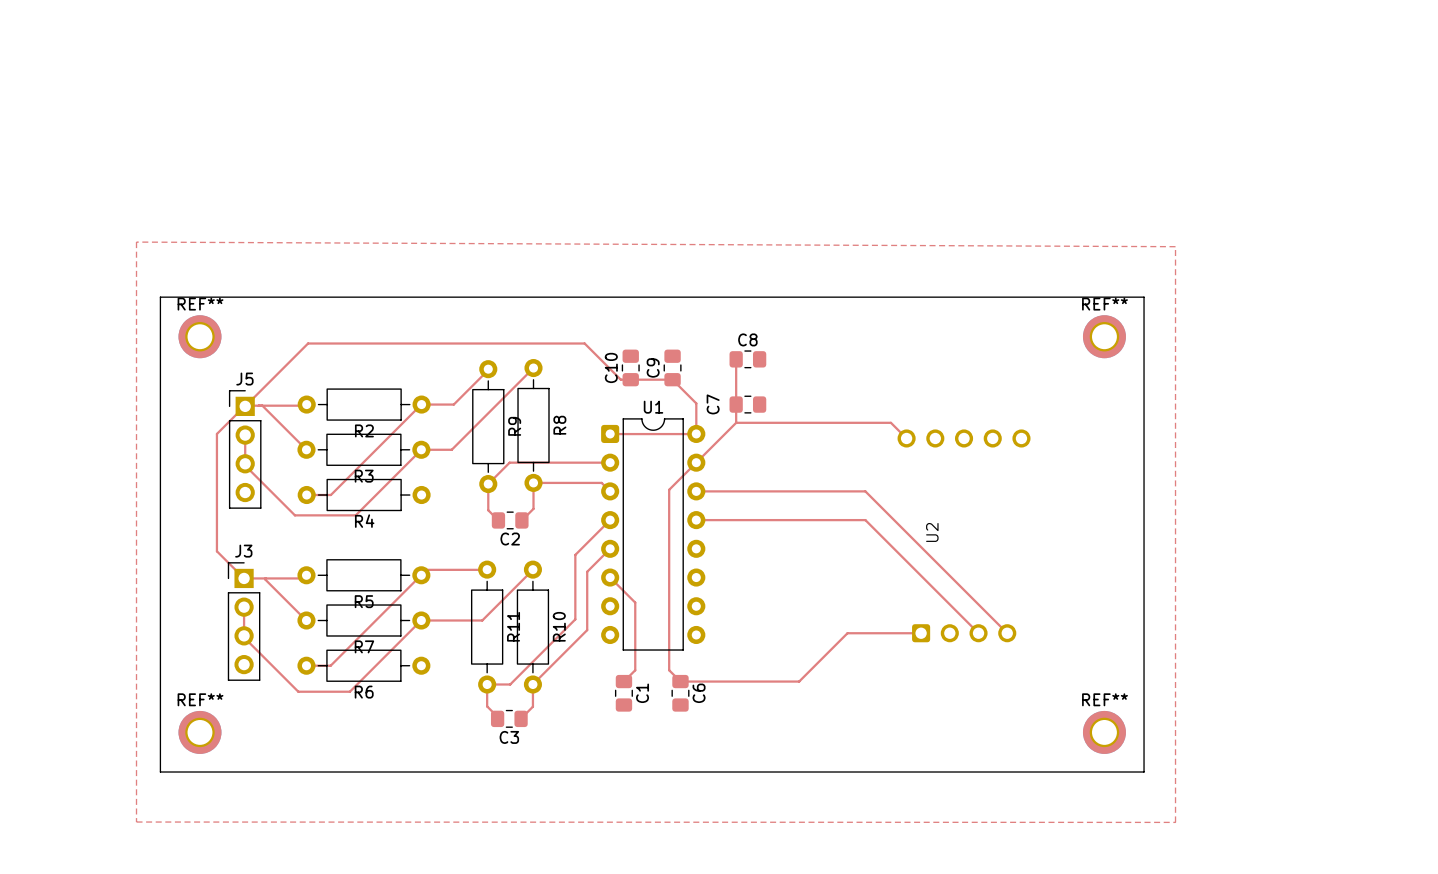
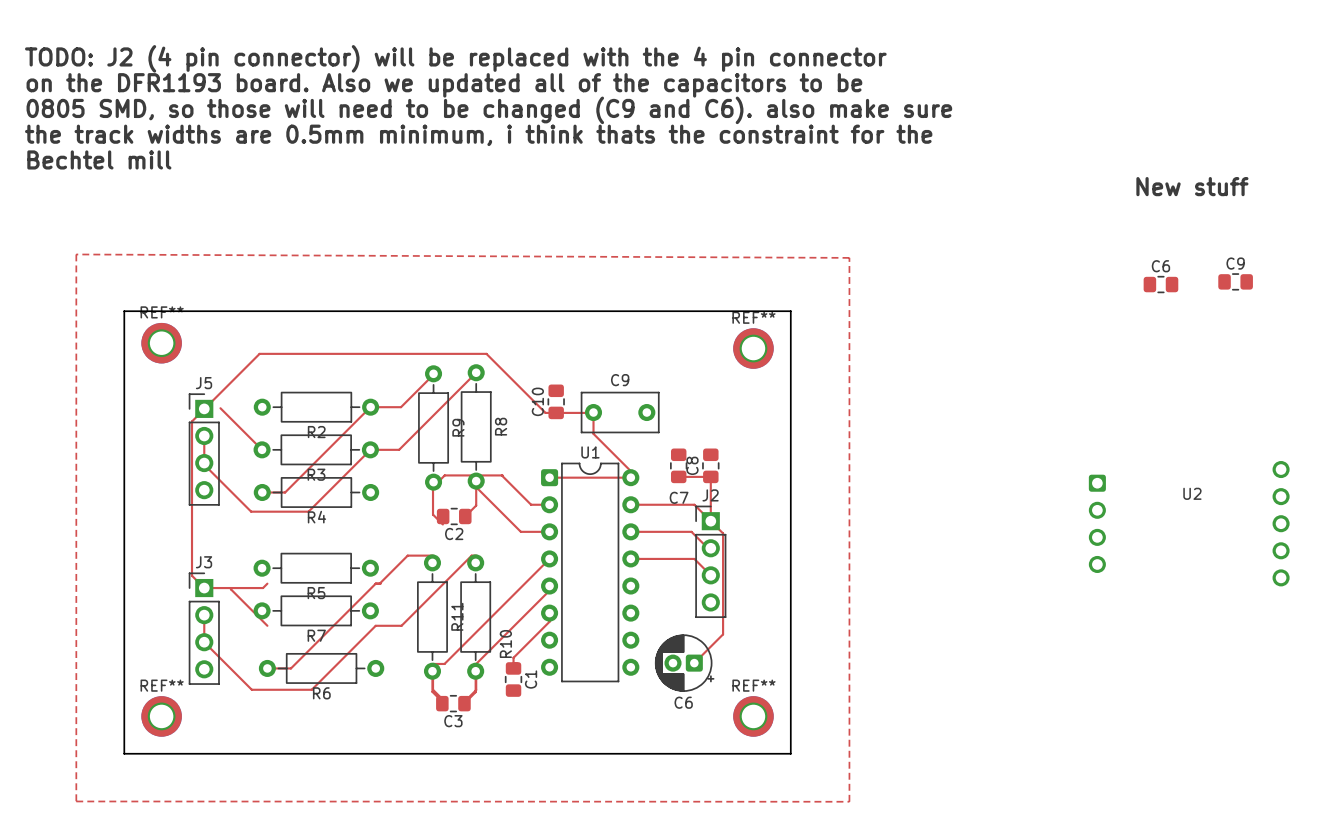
text: none -> TODO: J2 (4 pin connector) will be replaced with the 4 pin connector (455, 58)
text: none -> on the DFR1193 board. Also we updated all of the capacitors to be (444, 85)
text: none -> 0805 SMD, so those will need to be changed (C9 and C6). also make sure (489, 110)
text: none -> the track widths are 0.5mm minimum, i think thats the constraint for the (478, 135)
text: none -> Bechtel mill (99, 159)
text: none -> New stuff (1192, 186)
top zone outline: (136, 242) (1175, 246) (1175, 822) (136, 822) (136, 242) -> (76, 254) (76, 801) (849, 801) (849, 257) (76, 254)
C9: none -> (1235, 281)
C6: none -> (1160, 284)
board edge: (160, 302) (160, 297) (1144, 297) (1144, 772) (867, 772) -> (124, 311) (790, 311) (790, 753)
REF**: (1104, 336) -> none
C8 name position: C8 (747, 339) -> C8 (692, 465)
REF**: none -> (753, 348)
top track: (736, 359) (736, 422) -> none
C8 rotation: 0° (747, 359) -> 90° clockwise (710, 465)
C8 position: (747, 359) -> (710, 465)
C10 position: (630, 367) -> (556, 401)
C9: (672, 367) -> none
C7 name position: C7 (713, 404) -> C7 (679, 497)
C7 rotation: 0° (747, 404) -> 90° clockwise (678, 465)
C7 position: (747, 404) -> (678, 465)
top track: (305, 405) (245, 405) (216, 433) (216, 551) (244, 578) (303, 578) (306, 575) -> none
top track: (245, 406) (308, 343) (584, 343) (620, 379) (672, 379) (696, 403) (696, 433) -> none
C9: none -> (620, 412)
top track: (736, 422) (669, 489) (669, 670) (680, 681) (799, 681) (847, 633) (921, 633) -> none
top track: (736, 422) (890, 422) (906, 438) -> none
top track: (610, 434) (696, 434) -> none
top track: (610, 462) (509, 462) (488, 484) (488, 510) (498, 520) -> none
top track: none -> (501, 475) (531, 504) (549, 504)
top track: none -> (502, 475) (444, 475) (433, 487) (433, 514) (442, 524)
top track: none -> (678, 476) (710, 476) (709, 522)
top track: none -> (549, 477) (630, 477) (630, 471) (593, 433) (593, 412) (545, 412) (486, 353) (259, 353) (192, 421) (192, 575) (204, 588)
top track: (533, 489) (533, 482) (601, 482) (610, 491) -> (476, 487) (520, 531) (549, 531)
top track: (696, 491) (865, 491) (1007, 633) -> none
top track: none -> (630, 504) (694, 504) (723, 533) (723, 634) (694, 663)
top track: (610, 520) (575, 554) (575, 619) (510, 684) (487, 684) -> none
top track: (696, 520) (865, 520) (978, 633) -> none
U1 position: (653, 534) -> (590, 572)
U2 rotation: 0° (964, 535) -> 90° clockwise (1189, 523)
U2 position: (964, 535) -> (1189, 523)
top track: none -> (630, 531) (691, 531) (707, 548) (710, 548) (709, 549)
top track: (610, 548) (587, 571) (587, 630) (532, 684) -> none
top track: none -> (433, 555) (407, 555) (379, 583)
top track: none -> (476, 555) (471, 555) (401, 625) (375, 625) (311, 689) (251, 689) (204, 642) (204, 615)
top track: none -> (549, 558) (444, 663) (433, 663) (433, 689) (443, 700)
top track: none -> (630, 558) (694, 558) (710, 575) (709, 576)
J2: none -> (710, 561)
top track: (487, 569) (426, 569) (330, 665) (306, 665) -> none
top track: (532, 569) (482, 620) (421, 620) (349, 691) (298, 691) (244, 637) (244, 607) -> none
top track: (605, 577) (610, 577) (635, 602) (635, 670) (623, 681) -> none
top track: (265, 578) (306, 620) -> none
top track: none -> (267, 583) (263, 588) (204, 588)
top track: none -> (380, 583) (375, 583) (290, 668) (267, 668)
top track: none -> (549, 586) (549, 590) (476, 663) (476, 690) (465, 700)
top track: none -> (230, 588) (267, 625)
J3 position: (244, 621) -> (204, 628)
top track: none -> (549, 613) (549, 621) (513, 657) (513, 663) (517, 663)
R10 name position: R10 (559, 626) -> R10 (505, 643)
R6 position: (363, 665) -> (321, 668)
C6: none -> (684, 663)
C1 position: (623, 693) -> (513, 679)
C6: (680, 693) -> none
REF**: none -> (753, 716)
REF**: (1104, 732) -> none

